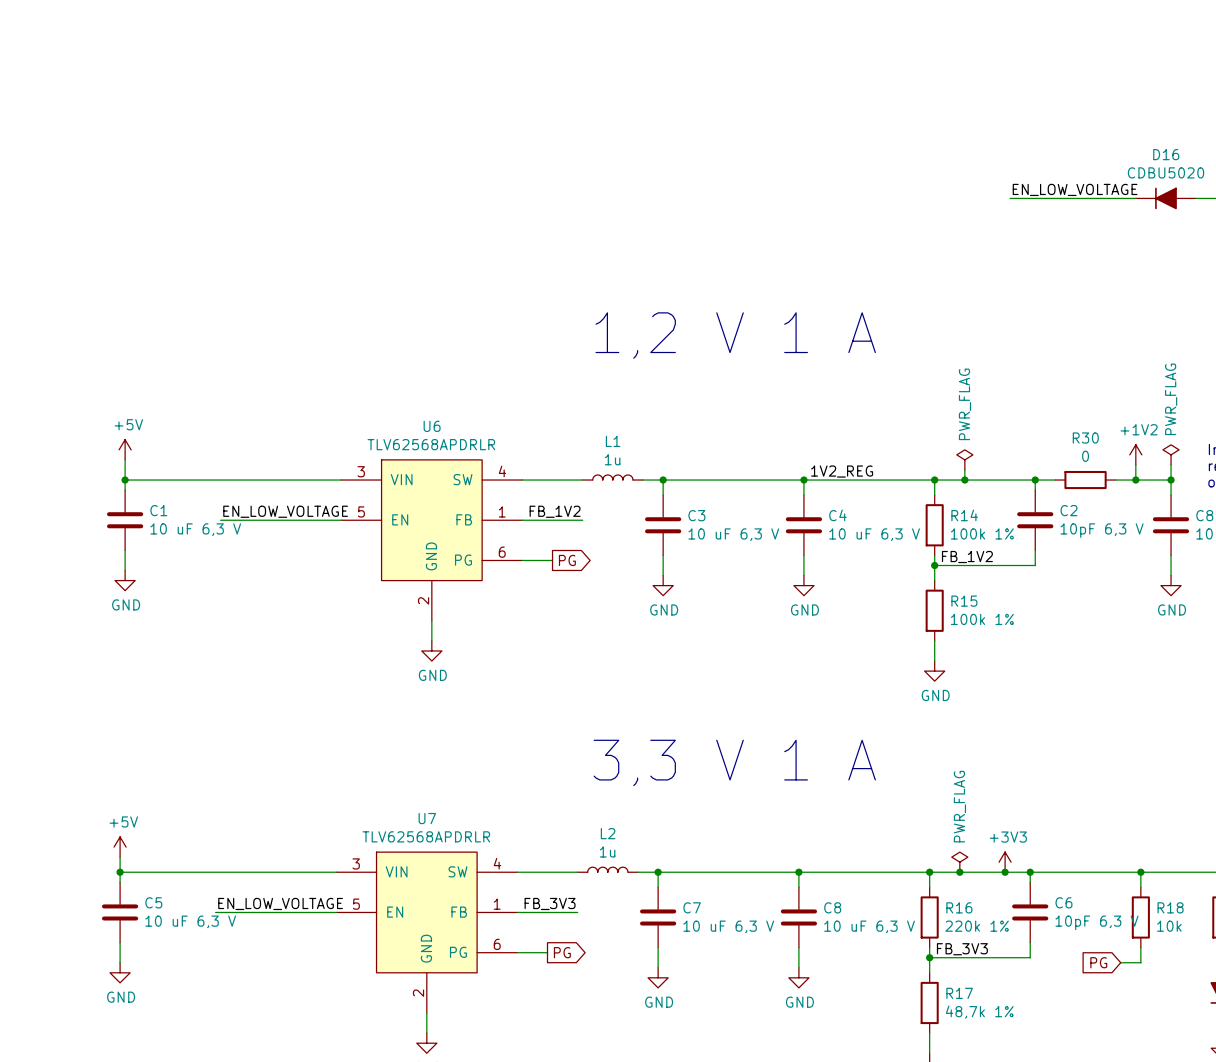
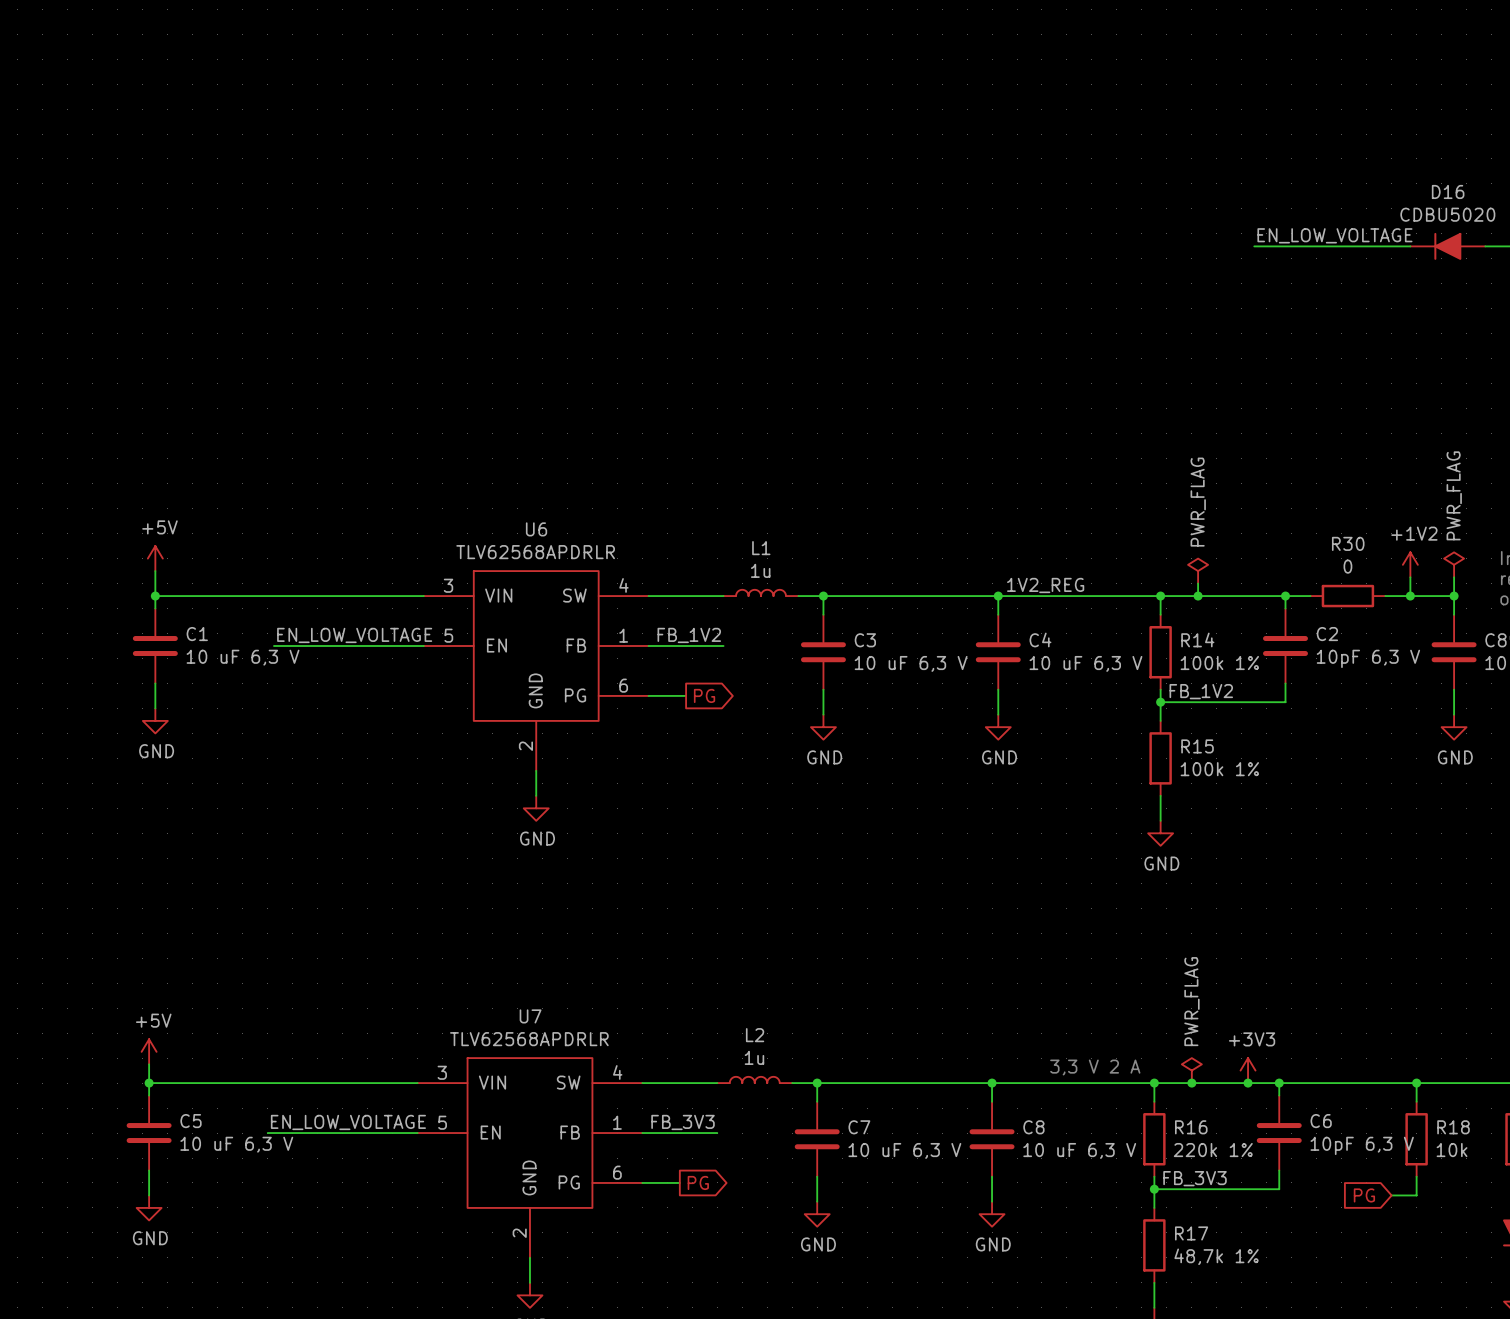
text: 1,2 V 1 A (735, 335) -> none
text: 3,3 V 1 A (734, 762) -> none
text: none -> 3,3 V 2 A (1095, 1067)

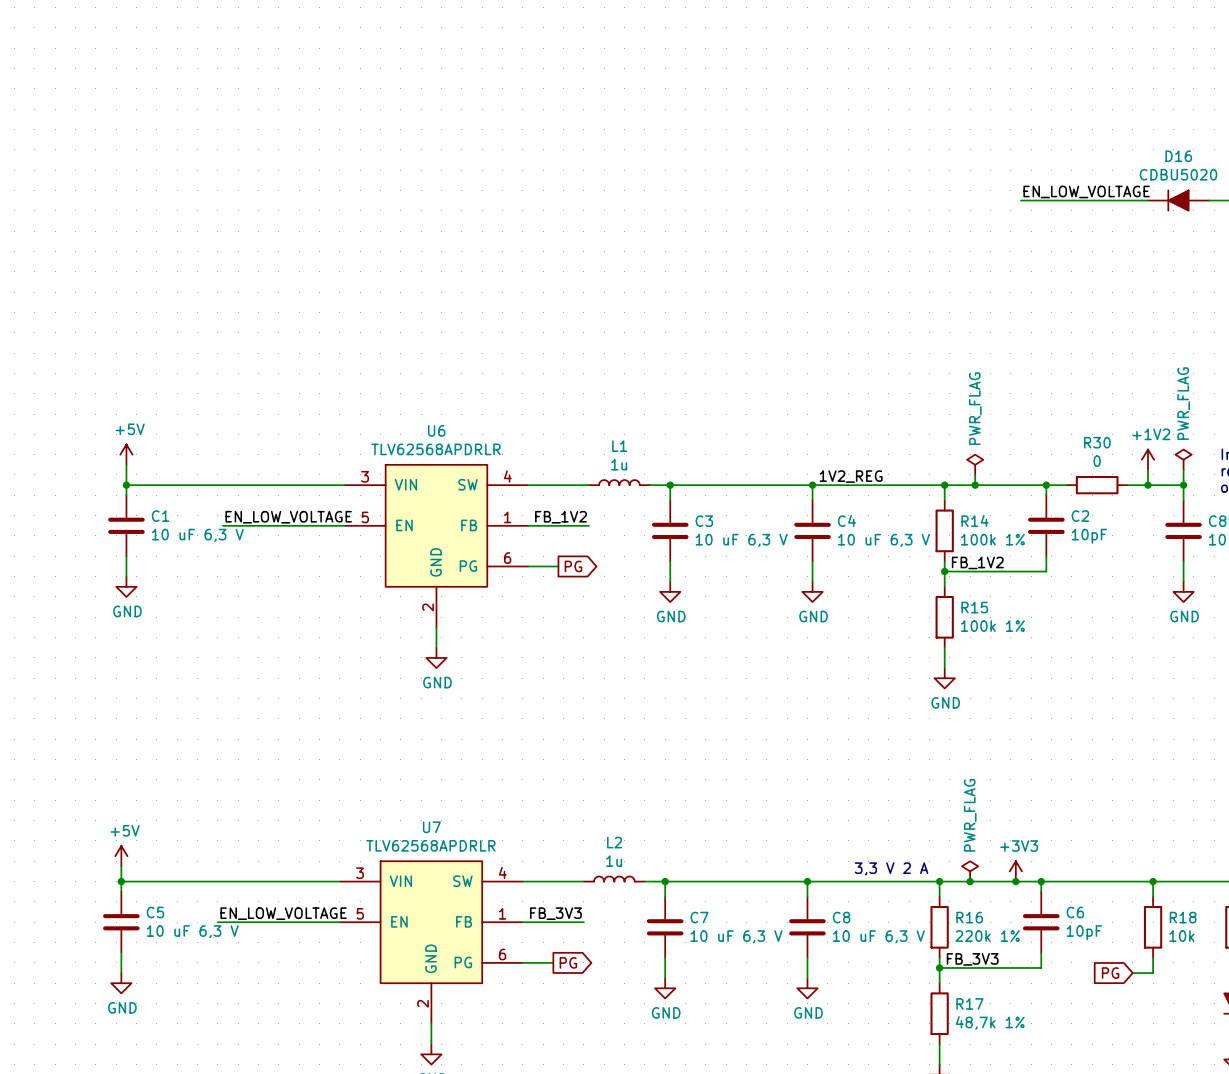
C2 value: 10pF 6,3 V (1368, 658) -> 10pF (1089, 536)
C6 value: 10pF 6,3 V (1362, 1145) -> 10pF (1084, 932)

